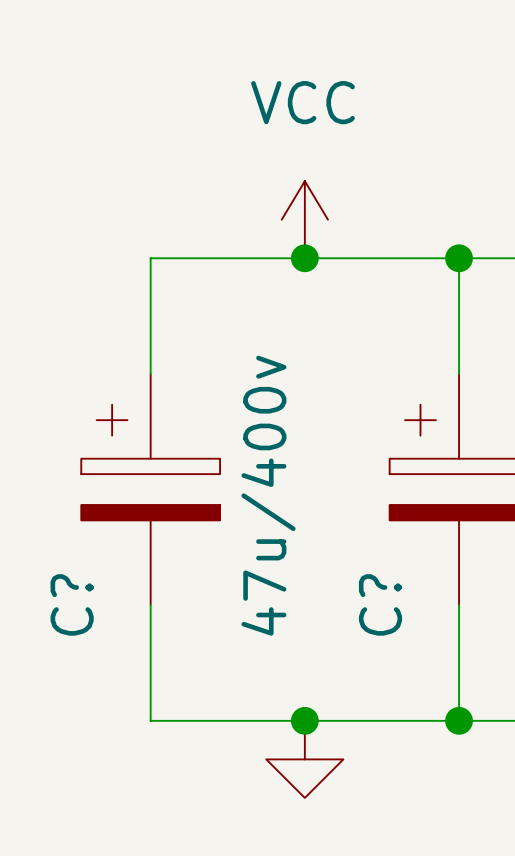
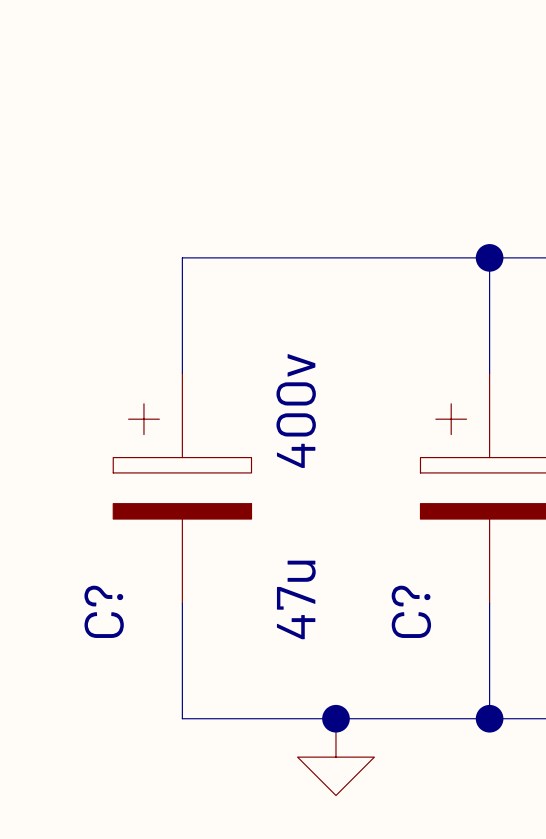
power symbol: VCC (304, 219) -> none
junction: (304, 258) -> none
C? text: none -> 400v (296, 410)
C? value: 47u/400v (268, 495) -> 47u (296, 599)

